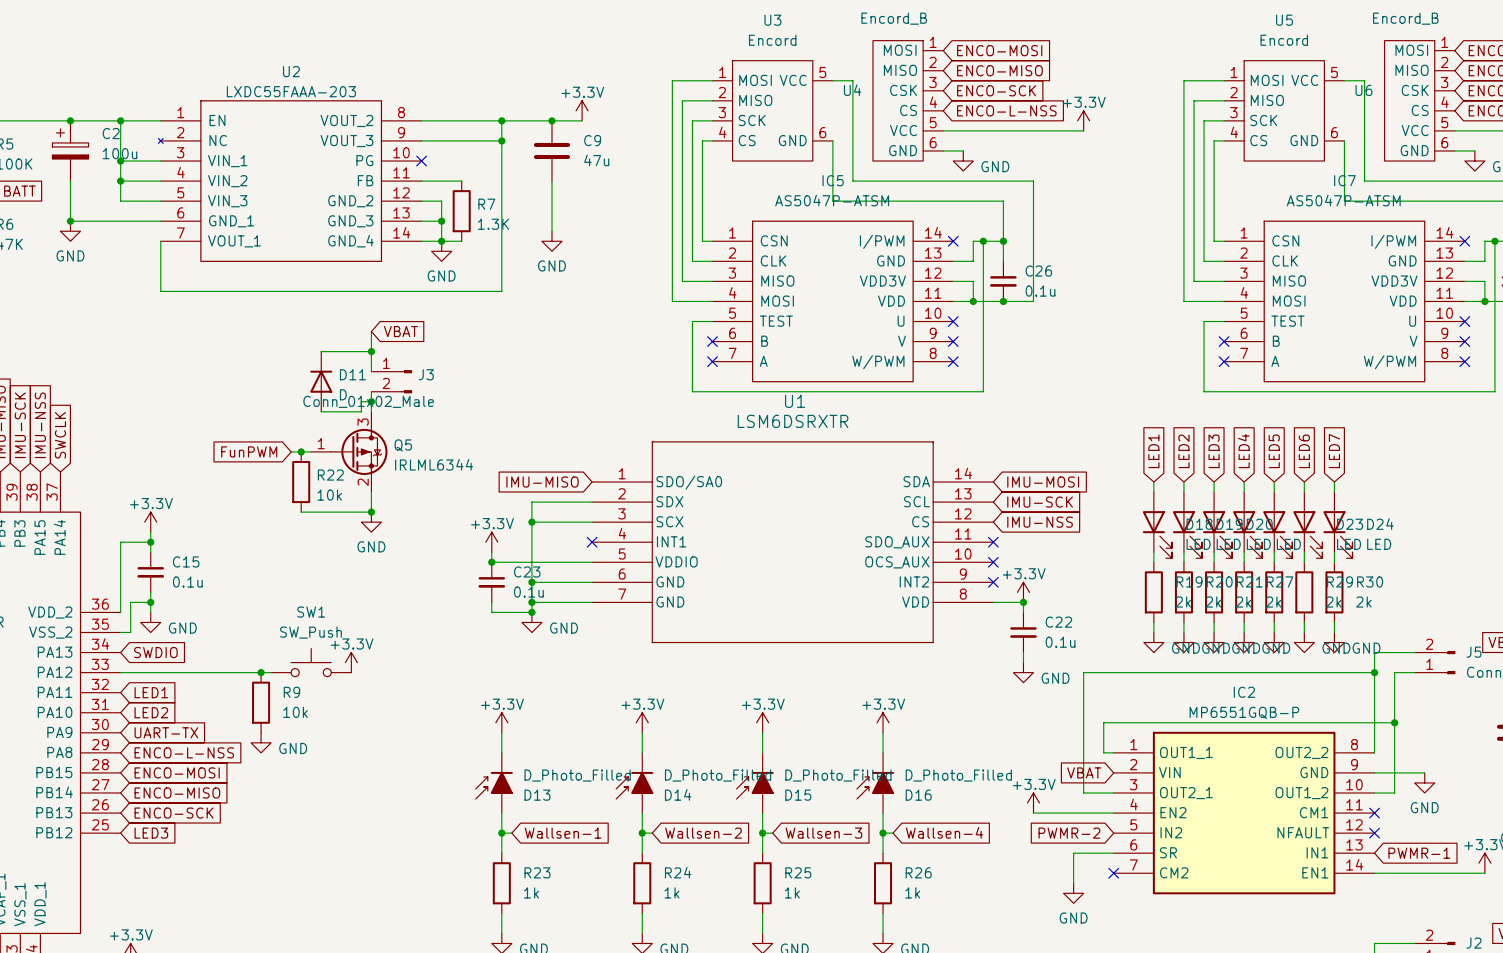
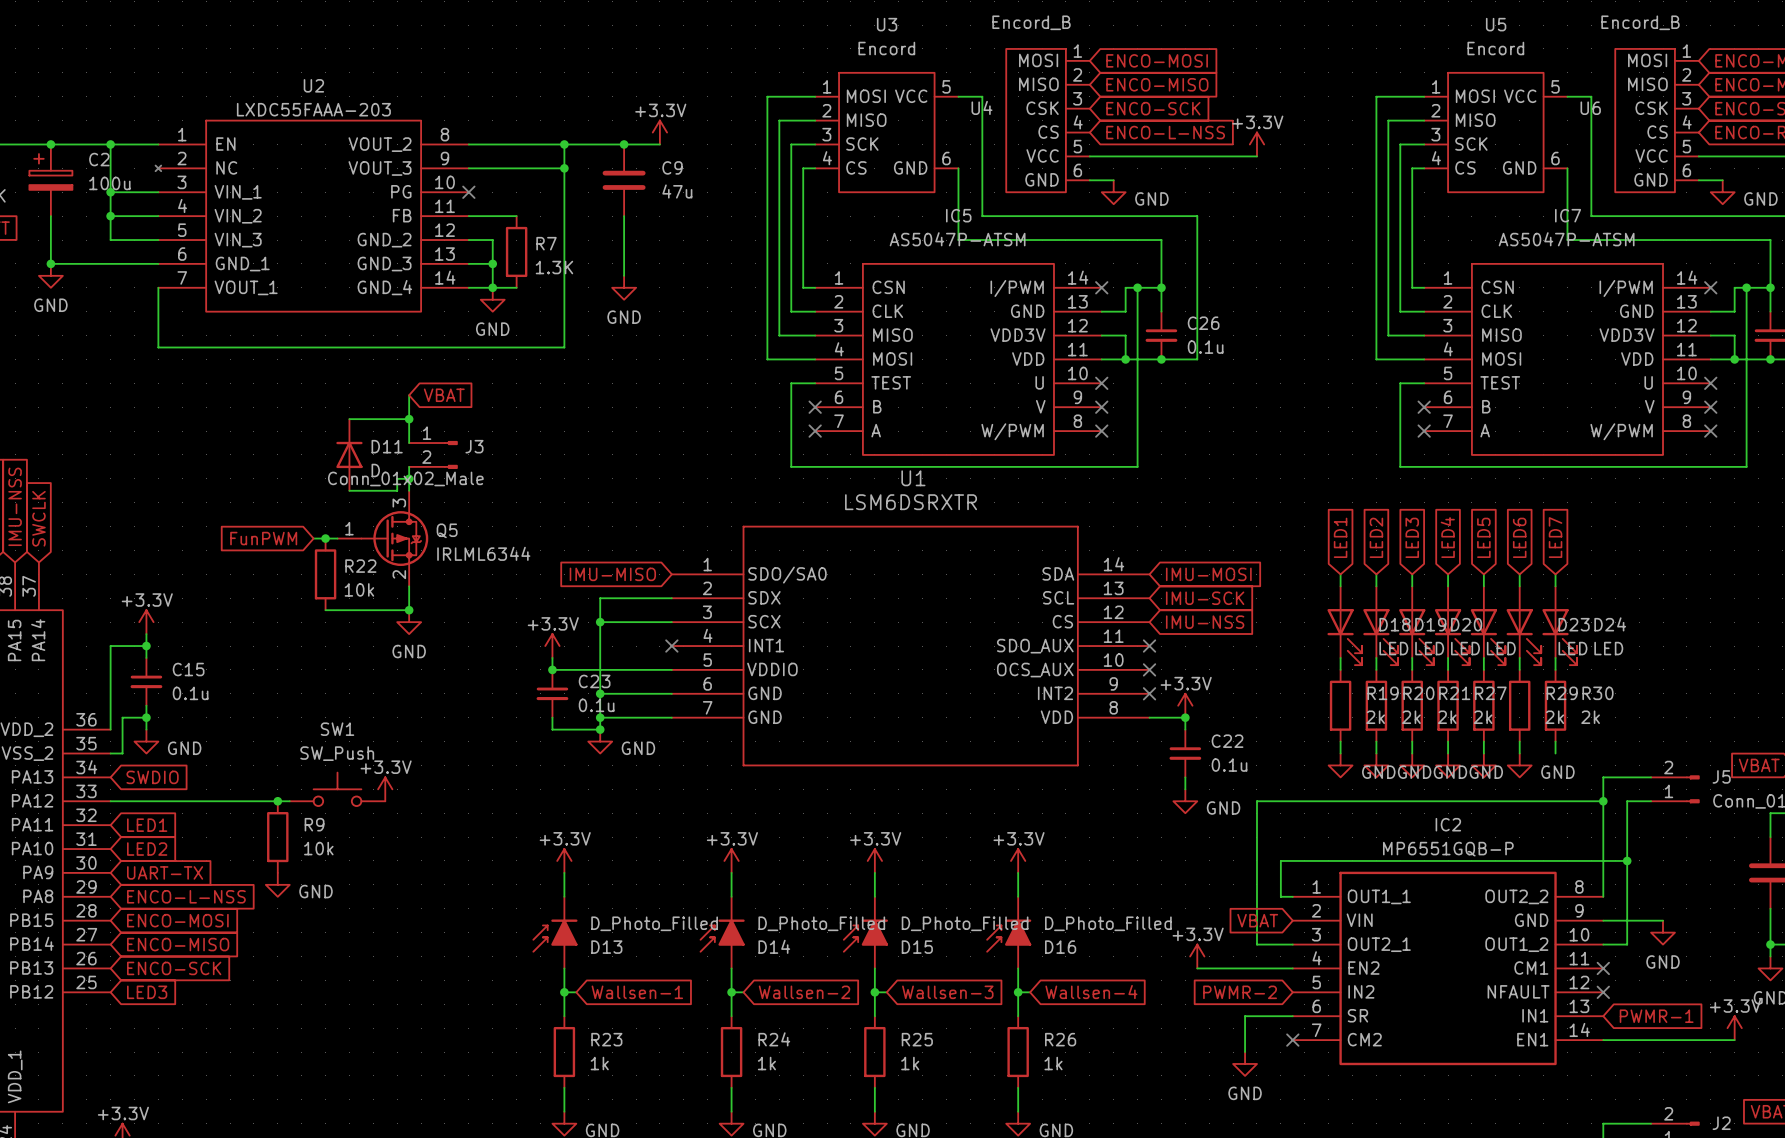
power symbol: GND (1334, 642) -> none

